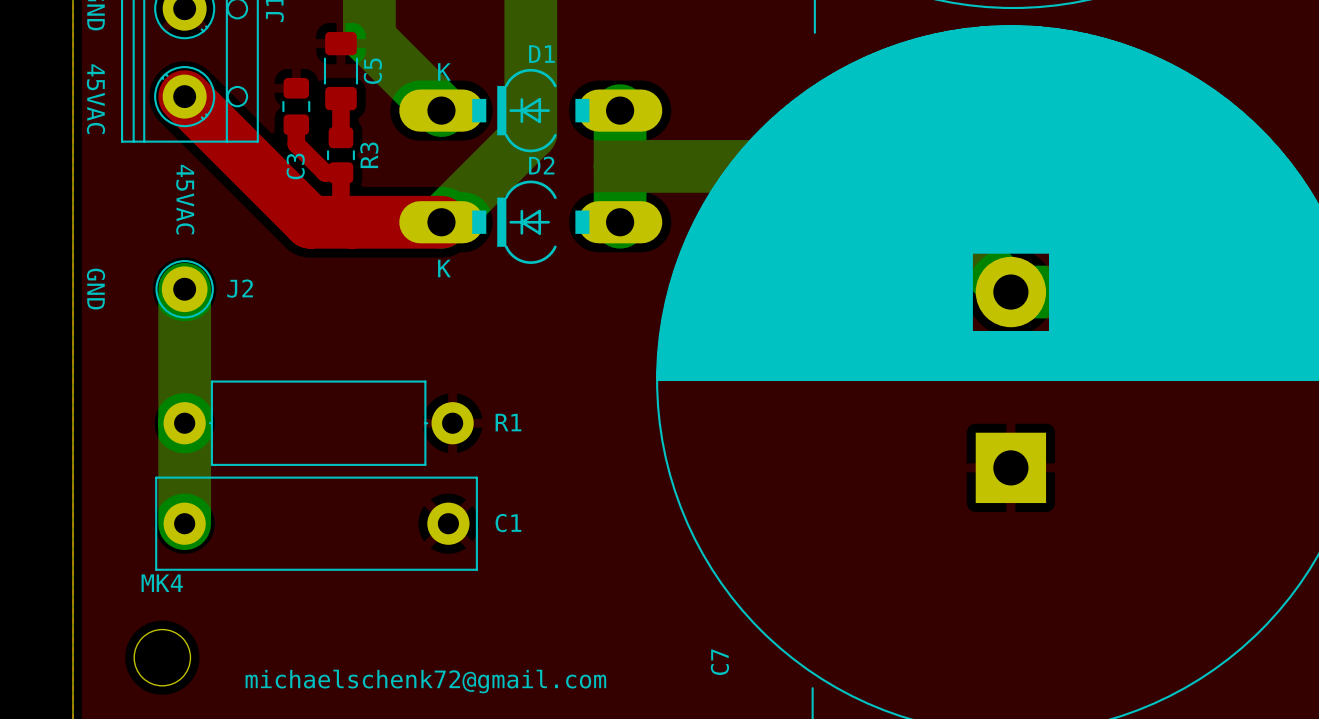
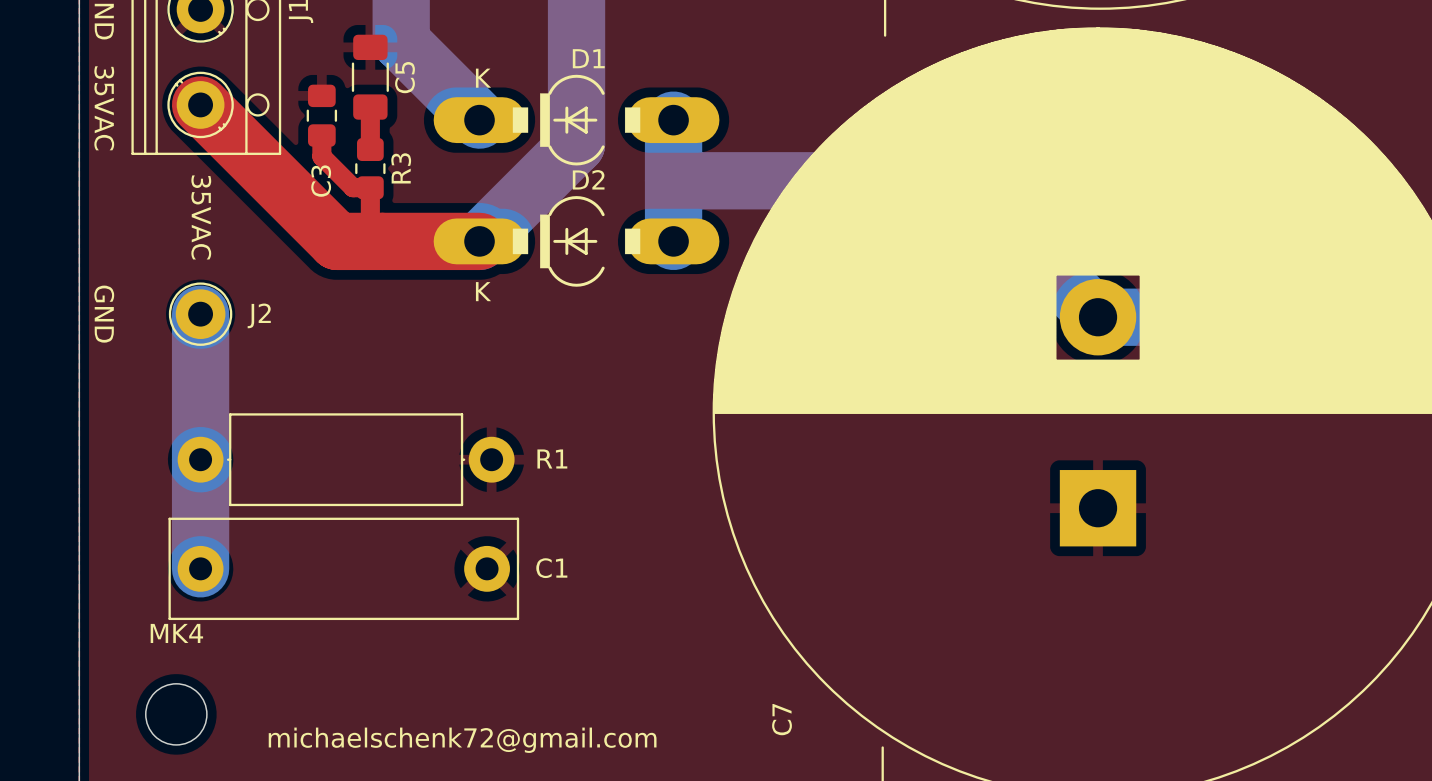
text: 45VAC (95, 99) -> 35VAC (104, 108)
text: 45VAC (185, 199) -> 35VAC (201, 217)

